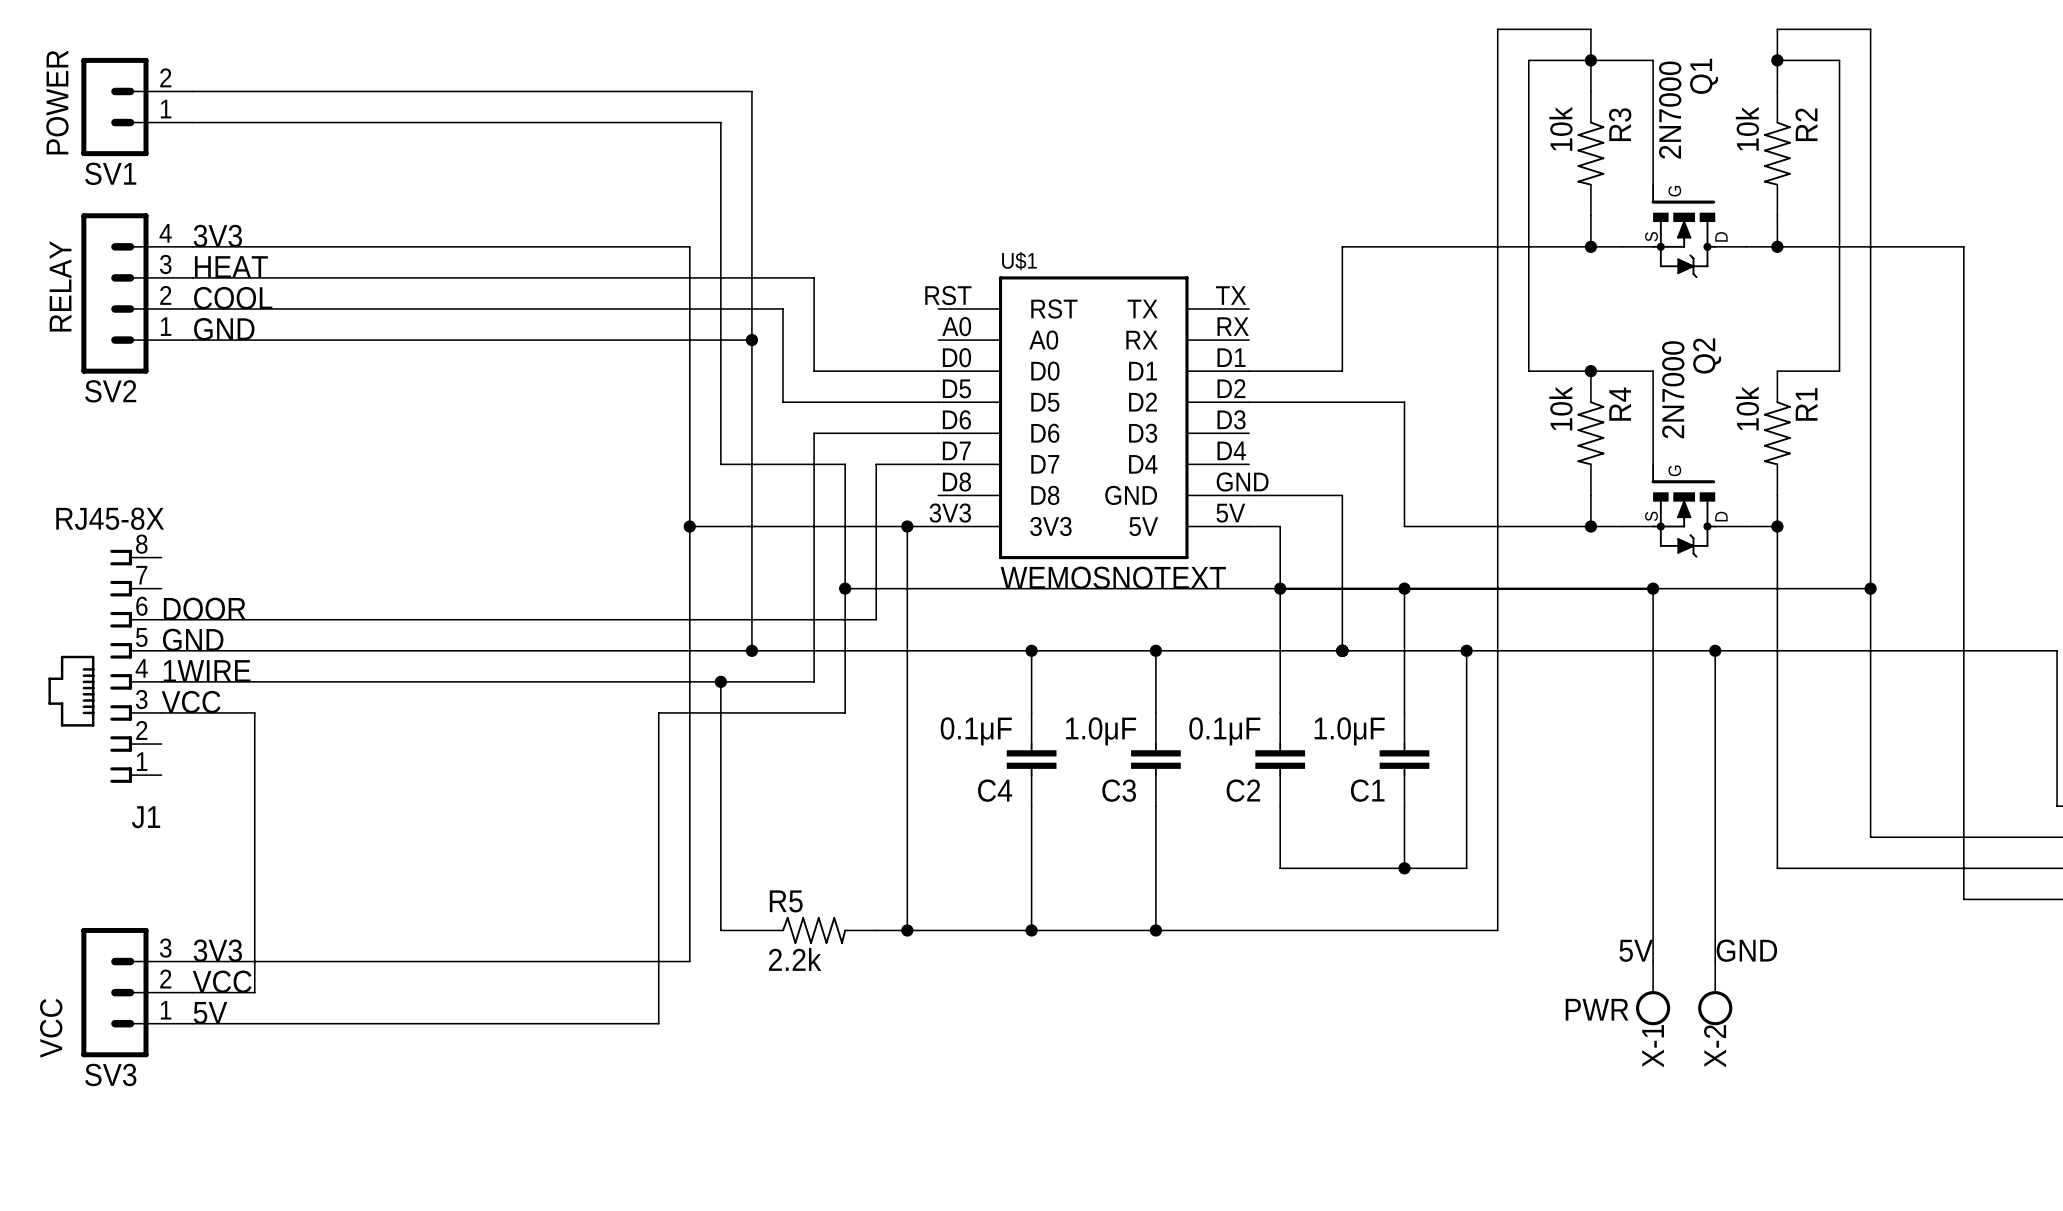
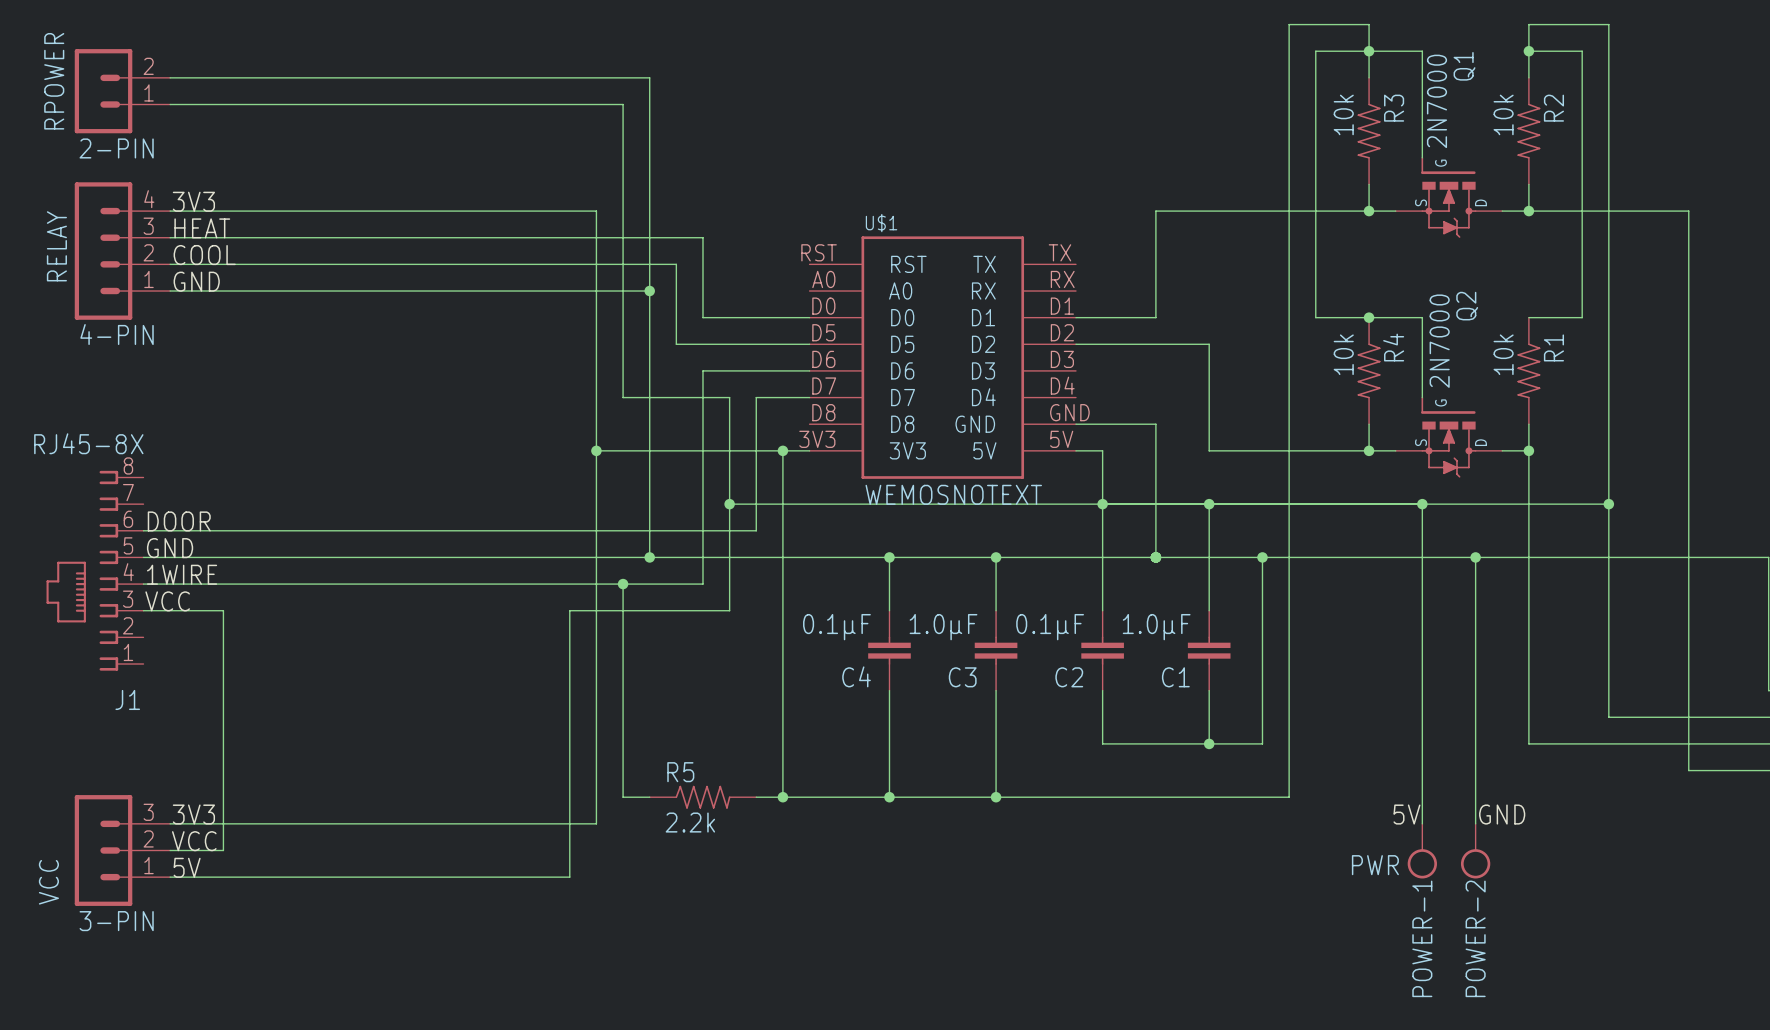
POWER name: POWER (57, 102) -> RPOWER (54, 81)
POWER value: SV1 (110, 173) -> 2-PIN (116, 148)
RELAY value: SV2 (110, 391) -> 4-PIN (117, 334)
X-1 name: X-1 (1653, 1046) -> POWER-1 (1422, 938)
X-2 name: X-2 (1715, 1046) -> POWER-2 (1475, 938)
VCC value: SV3 (110, 1074) -> 3-PIN (116, 921)

